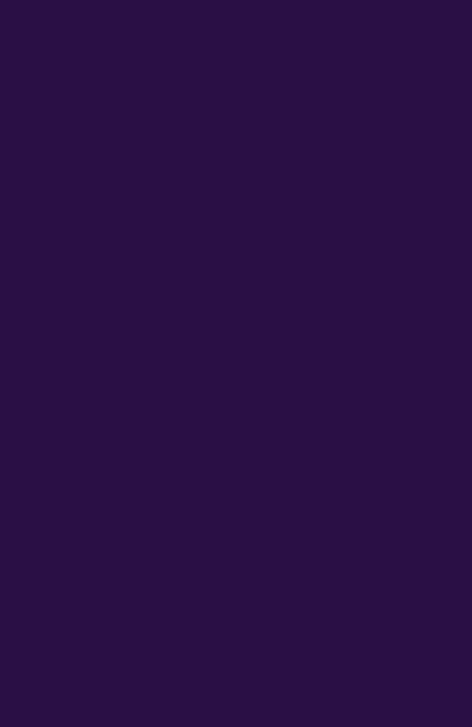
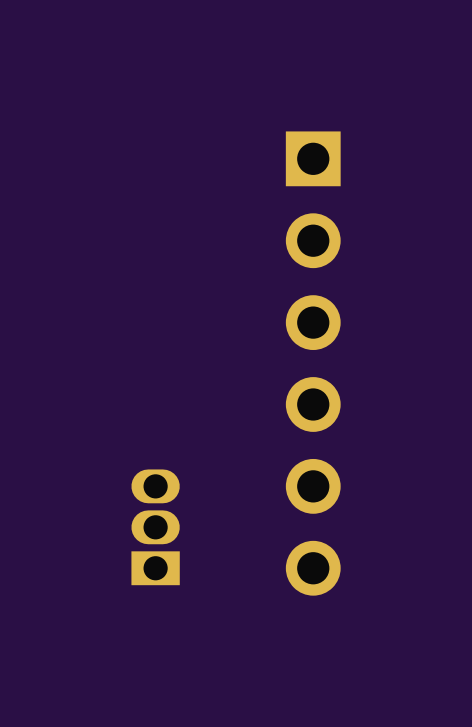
part: none -> (313, 363)
part: none -> (155, 527)

